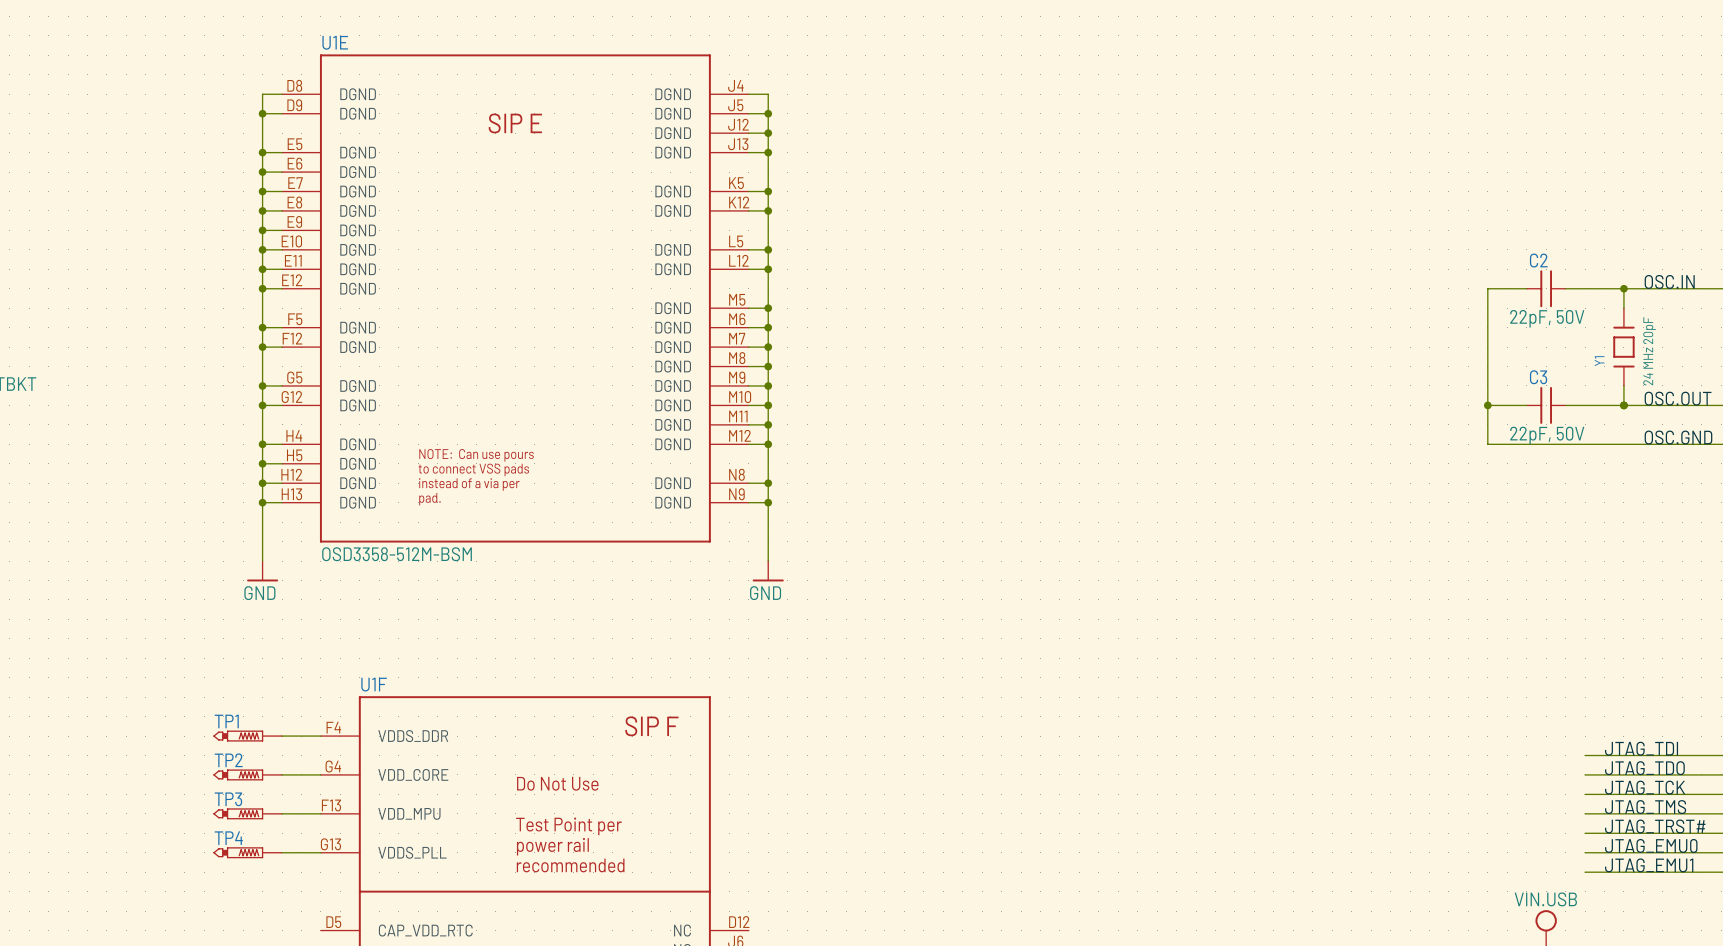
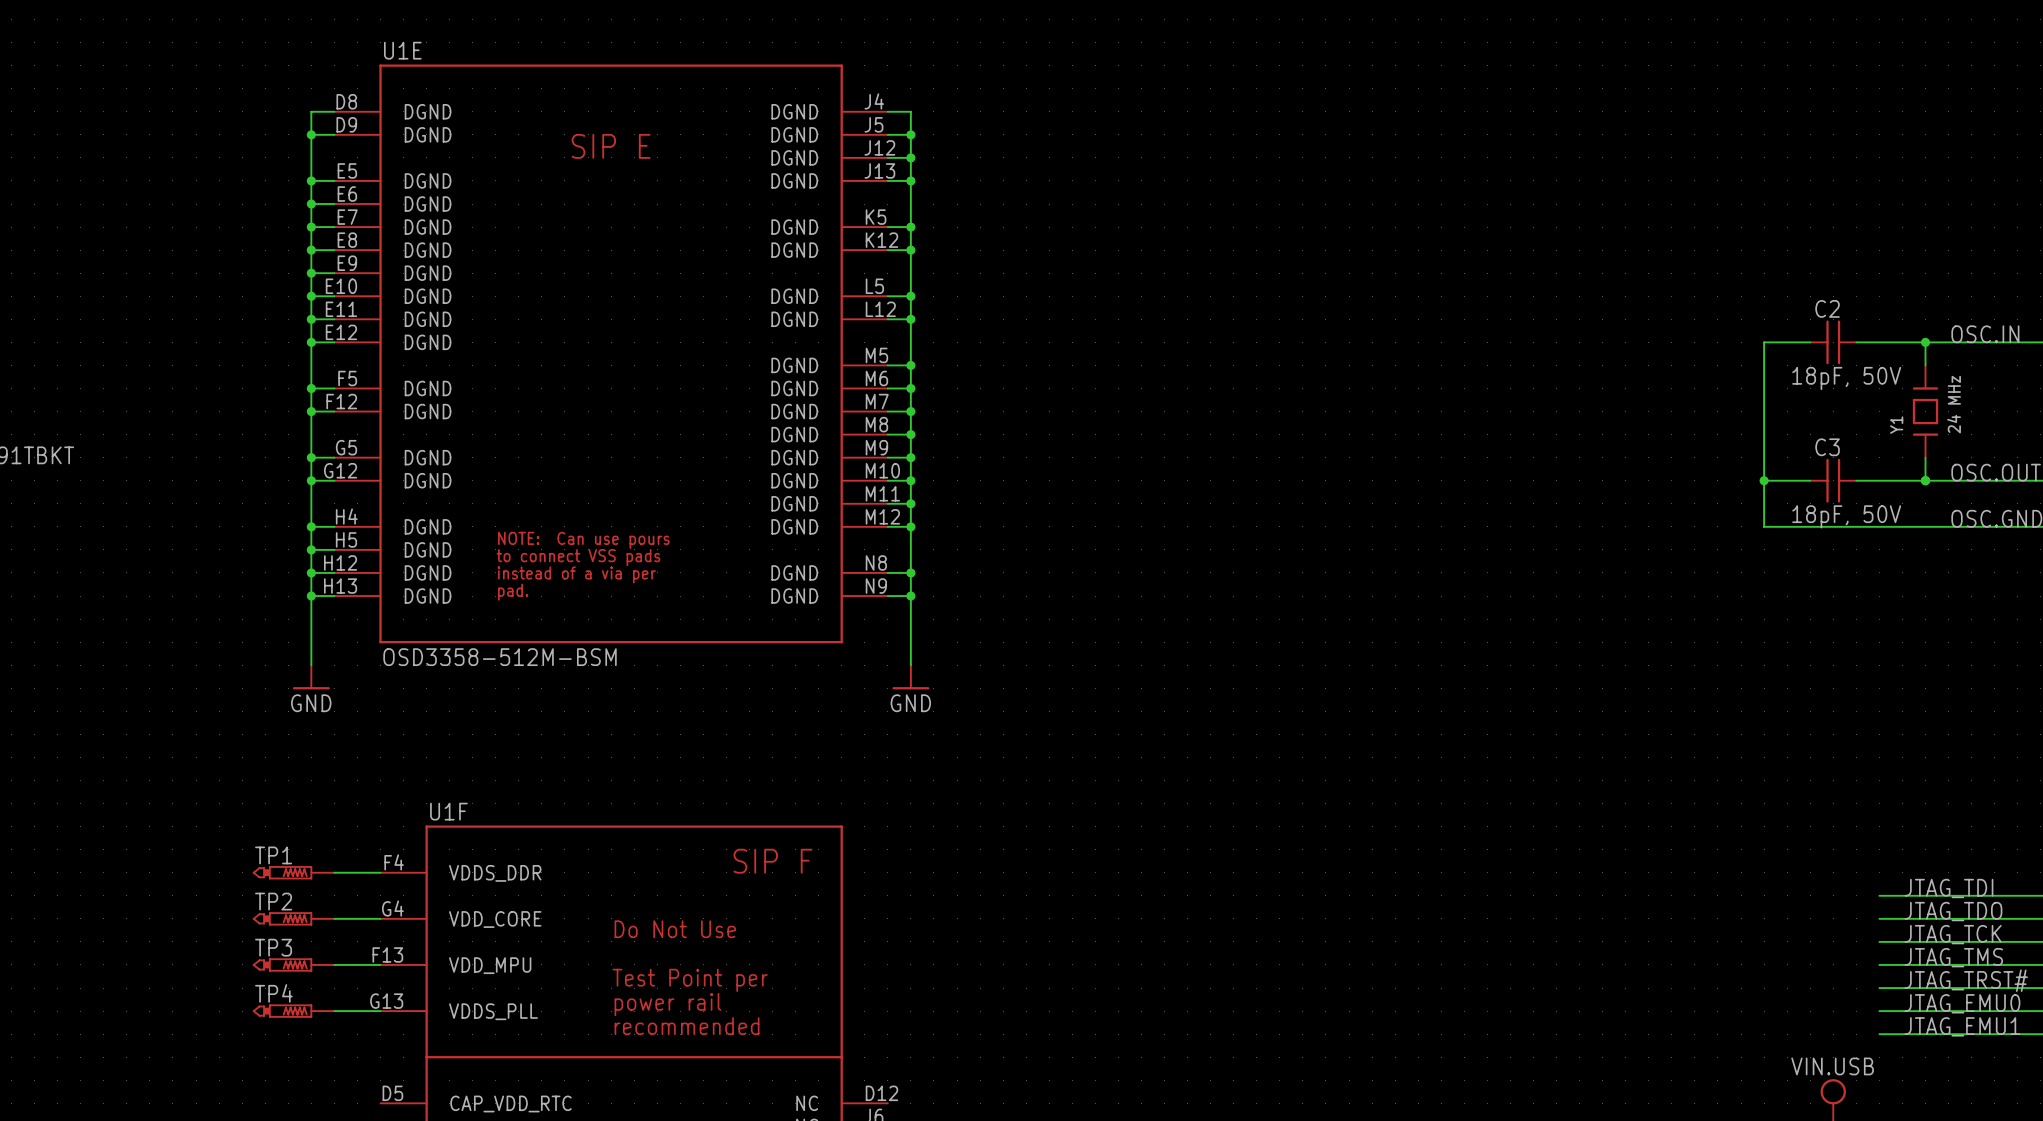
C2 value: 22pF, 50V (1547, 318) -> 18pF, 50V (1846, 378)
Y1 value: 24 MHz 20pF (1649, 351) -> 24 MHz (1954, 404)
C3 value: 22pF, 50V (1547, 435) -> 18pF, 50V (1846, 516)

